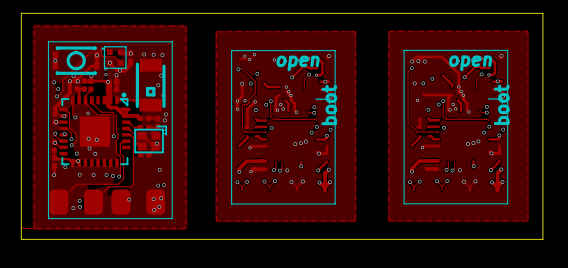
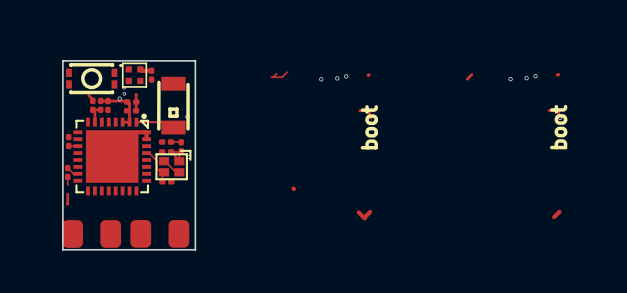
board edge: (21, 13) (542, 13) (542, 239) (21, 239) (21, 13) -> none
zone outline: (216, 31) (355, 31) (355, 221) (216, 221) (216, 31) -> none
zone outline: (388, 31) (527, 31) (527, 220) (388, 220) (388, 31) -> none
line: (48, 41) (172, 41) (172, 218) (48, 218) (48, 41) -> none
board edge: none -> (62, 60) (195, 60) (195, 249) (62, 249) (62, 60)
line: (231, 50) (335, 50) (335, 204) (231, 204) (231, 50) -> none
line: (404, 50) (507, 50) (507, 203) (404, 203) (404, 50) -> none
via: (130, 53) -> none
via: (144, 54) -> none
via: (153, 54) -> none
via: (254, 54) -> none
track: (96, 55) (96, 65) (91, 65) (77, 81) -> none
via: (96, 55) -> none
via: (162, 55) -> none
via: (501, 55) -> none
via: (244, 56) -> none
via: (329, 56) -> none
track: (317, 57) (322, 62) (322, 73) (316, 75) -> none
track: (489, 57) (494, 62) (494, 72) (488, 75) -> none
via: (249, 59) -> none
via: (274, 59) -> none
via: (55, 60) -> none
track: (130, 61) (130, 64) (124, 70) (116, 70) (109, 62) -> none
track: (412, 61) (416, 56) (442, 56) (458, 73) (458, 91) (467, 103) (467, 110) -> none
via: (412, 61) -> none
via: (418, 61) -> none
via: (424, 61) -> none
via: (109, 62) -> none
track: (120, 62) (114, 56) (103, 56) (101, 49) (93, 49) (62, 80) (62, 90) (60, 93) -> none
text: open (298, 63) -> none
text: open (470, 63) -> none
track: (489, 67) (475, 66) (465, 76) -> none
track: (317, 68) (302, 66) (292, 77) -> none
track: (411, 68) (408, 72) (408, 122) (417, 132) (438, 132) -> none
via: (411, 68) -> none
track: (238, 69) (242, 68) (255, 81) (255, 93) (249, 99) (249, 102) (242, 106) (242, 129) (245, 132) (266, 133) -> none
via: (238, 69) -> none
via: (119, 70) -> none
via: (257, 73) -> none
track: (309, 74) (304, 79) (304, 90) -> none
via: (309, 74) -> none
track: (481, 74) (476, 79) (476, 90) -> none
via: (481, 74) -> none
via: (91, 75) -> none
via: (116, 75) -> none
via: (161, 75) -> none
via: (316, 75) -> none
track: (442, 75) (452, 86) -> none
via: (488, 75) -> none
via: (73, 76) -> none
via: (292, 77) -> none
via: (464, 77) -> none
via: none -> (119, 98)
via: (432, 78) -> none
via: (69, 81) -> none
track: (77, 81) (69, 81) (69, 93) (55, 107) (55, 113) -> none
via: (77, 81) -> none
track: (108, 81) (108, 105) (110, 107) (116, 107) (124, 115) (137, 115) (140, 118) -> none
via: (108, 81) -> none
track: (320, 81) (329, 81) -> none
via: (325, 81) -> none
track: (493, 81) (501, 81) -> none
via: (497, 81) -> none
via: (54, 82) -> none
track: (242, 83) (242, 96) (237, 101) (237, 109) -> none
via: (242, 83) -> none
via: (250, 83) -> none
track: (264, 83) (267, 86) (279, 86) -> none
via: (414, 83) -> none
via: (423, 83) -> none
via: (158, 85) -> none
via: (458, 86) -> none
via: (286, 87) -> none
via: (58, 89) -> none
track: (90, 89) (85, 95) (85, 102) (97, 114) (111, 114) (113, 116) (113, 136) -> none
track: (286, 91) (294, 103) (294, 111) -> none
via: (288, 91) -> none
via: (461, 91) -> none
part footprint: [59, 92, 131, 168] -> [73, 113, 152, 196]
track: (59, 93) (57, 96) -> none
track: (423, 94) (451, 95) (448, 98) (448, 110) -> none
track: (279, 95) (275, 98) (275, 111) -> none
via: (290, 95) -> none
via: (463, 95) -> none
via: (57, 96) -> none
via: (330, 96) -> none
line: (315, 99) (329, 99) (329, 103) -> none
line: (488, 99) (502, 99) (502, 103) -> none
track: (72, 100) (72, 114) (75, 117) -> none
track: (91, 100) (101, 112) (112, 112) (116, 115) (116, 132) (118, 134) (116, 152) (120, 157) (119, 176) -> none
via: (245, 100) -> none
track: (285, 100) (288, 103) (288, 111) -> none
via: (417, 100) -> none
track: (457, 100) (460, 103) (460, 110) -> none
via: (237, 101) -> none
track: (255, 101) (247, 109) (247, 127) (245, 127) -> none
via: (255, 101) -> none
track: (270, 101) (270, 116) (273, 119) (316, 120) -> none
via: (270, 101) -> none
track: (443, 101) (443, 116) (446, 119) (489, 120) -> none
via: (443, 101) -> none
via: (266, 104) -> none
via: (280, 104) -> none
via: (438, 104) -> none
via: (453, 104) -> none
via: (486, 106) -> none
via: (314, 107) -> none
via: (455, 108) -> none
track: (63, 109) (69, 113) (69, 128) (75, 134) (75, 140) (71, 145) -> none
via: (237, 109) -> none
via: (255, 109) -> none
via: (283, 109) -> none
via: (428, 109) -> none
via: (450, 109) -> none
via: (277, 110) -> none
track: (479, 110) (486, 112) -> none
track: (307, 111) (314, 112) -> none
via: (296, 112) -> none
via: (314, 112) -> none
via: (468, 112) -> none
via: (486, 112) -> none
via: (88, 113) -> none
via: (165, 114) -> none
via: (64, 116) -> none
via: (75, 117) -> none
track: (255, 118) (257, 120) (266, 120) -> none
track: (420, 118) (420, 127) (417, 127) -> none
track: (428, 118) (430, 120) (438, 120) -> none
via: (164, 120) -> none
via: (56, 122) -> none
track: (126, 122) (134, 127) (140, 127) -> none
track: (266, 126) (255, 127) -> none
via: (316, 126) -> none
track: (438, 126) (428, 127) -> none
via: (489, 126) -> none
via: (271, 127) -> none
via: (444, 127) -> none
track: (63, 128) (66, 128) (71, 133) (71, 139) -> none
via: (330, 129) -> none
via: (503, 129) -> none
via: (311, 132) -> none
via: (484, 132) -> none
track: (55, 133) (60, 141) (63, 141) -> none
via: (55, 133) -> none
via: (64, 134) -> none
track: (126, 134) (130, 134) (133, 137) (133, 143) -> none
track: (326, 135) (325, 139) (316, 139) -> none
via: (326, 135) -> none
track: (499, 135) (497, 139) (489, 139) -> none
via: (499, 135) -> none
via: (113, 136) -> none
track: (247, 136) (239, 146) -> none
track: (255, 136) (266, 139) -> none
track: (419, 136) (411, 146) -> none
track: (428, 136) (438, 139) -> none
via: (88, 138) -> none
via: (71, 139) -> none
via: (96, 139) -> none
track: (126, 141) (120, 143) (120, 153) (123, 156) (123, 178) (118, 184) (76, 184) (58, 202) -> none
via: (305, 141) -> none
via: (478, 141) -> none
via: (55, 142) -> none
via: (156, 143) -> none
via: (300, 143) -> none
via: (467, 143) -> none
via: (473, 143) -> none
track: (133, 144) (133, 184) (130, 186) (109, 186) (93, 202) -> none
via: (295, 144) -> none
via: (71, 145) -> none
track: (266, 145) (250, 147) -> none
track: (327, 145) (327, 153) (316, 152) -> none
track: (438, 145) (422, 147) -> none
track: (499, 145) (499, 153) (489, 151) -> none
via: (250, 147) -> none
via: (422, 147) -> none
via: (89, 148) -> none
via: (76, 153) -> none
via: (95, 153) -> none
via: (319, 153) -> none
via: (491, 153) -> none
track: (54, 156) (57, 159) (68, 159) (72, 162) (74, 161) (79, 162) -> none
part: (54, 161) -> none
via: (78, 161) -> none
track: (265, 161) (246, 161) (239, 168) (239, 171) -> none
track: (275, 161) (274, 170) -> none
track: (282, 161) (282, 168) (279, 170) -> none
track: (301, 161) (301, 166) -> none
track: (326, 161) (318, 170) -> none
track: (437, 161) (419, 161) (411, 168) (411, 171) -> none
track: (448, 161) (446, 169) -> none
track: (454, 161) (454, 168) (452, 170) -> none
track: (473, 161) (473, 166) -> none
track: (499, 161) (490, 170) -> none
via: (301, 166) -> none
via: (473, 166) -> none
via: (65, 167) -> none
track: (426, 168) (437, 169) -> none
via: (159, 169) -> none
track: (265, 169) (253, 168) (251, 171) -> none
track: (328, 169) (325, 173) (325, 190) -> none
via: (328, 169) -> none
via: (446, 169) -> none
track: (501, 169) (497, 173) (497, 190) -> none
via: (501, 169) -> none
via: (274, 170) -> none
via: (279, 170) -> none
via: (287, 170) -> none
via: (318, 170) -> none
via: (452, 170) -> none
via: (459, 170) -> none
via: (490, 170) -> none
via: (239, 171) -> none
via: (251, 171) -> none
via: (411, 171) -> none
via: (79, 174) -> none
via: (54, 175) -> none
via: (93, 175) -> none
via: (106, 175) -> none
via: (112, 175) -> none
via: (119, 176) -> none
track: (447, 180) (441, 186) -> none
via: (447, 180) -> none
track: (247, 181) (241, 187) -> none
via: (247, 181) -> none
track: (264, 181) (269, 186) -> none
via: (264, 181) -> none
track: (274, 181) (269, 186) -> none
via: (274, 181) -> none
track: (291, 181) (297, 187) -> none
via: (291, 181) -> none
track: (302, 181) (297, 187) (297, 190) -> none
via: (302, 181) -> none
track: (419, 181) (414, 187) -> none
via: (419, 181) -> none
track: (436, 181) (441, 186) -> none
via: (436, 181) -> none
track: (463, 181) (469, 187) -> none
via: (463, 181) -> none
track: (475, 181) (469, 187) (469, 190) -> none
via: (475, 181) -> none
via: (502, 181) -> none
track: (237, 182) (241, 186) (241, 190) -> none
via: (237, 182) -> none
via: (319, 182) -> none
via: (329, 182) -> none
track: (409, 182) (414, 186) (414, 190) -> none
via: (409, 182) -> none
track: (492, 182) (497, 187) -> none
via: (492, 182) -> none
via: (158, 185) -> none
via: (163, 185) -> none
track: (269, 186) (269, 190) -> none
track: (441, 186) (441, 190) -> none
via: (161, 198) -> none
via: (129, 199) -> none
via: (153, 199) -> none
via: (79, 200) -> none
via: (79, 206) -> none
via: (159, 206) -> none
via: (73, 208) -> none
via: (154, 210) -> none
zone outline: (21, 228) (185, 228) (185, 26) (34, 26) (34, 228) -> none

